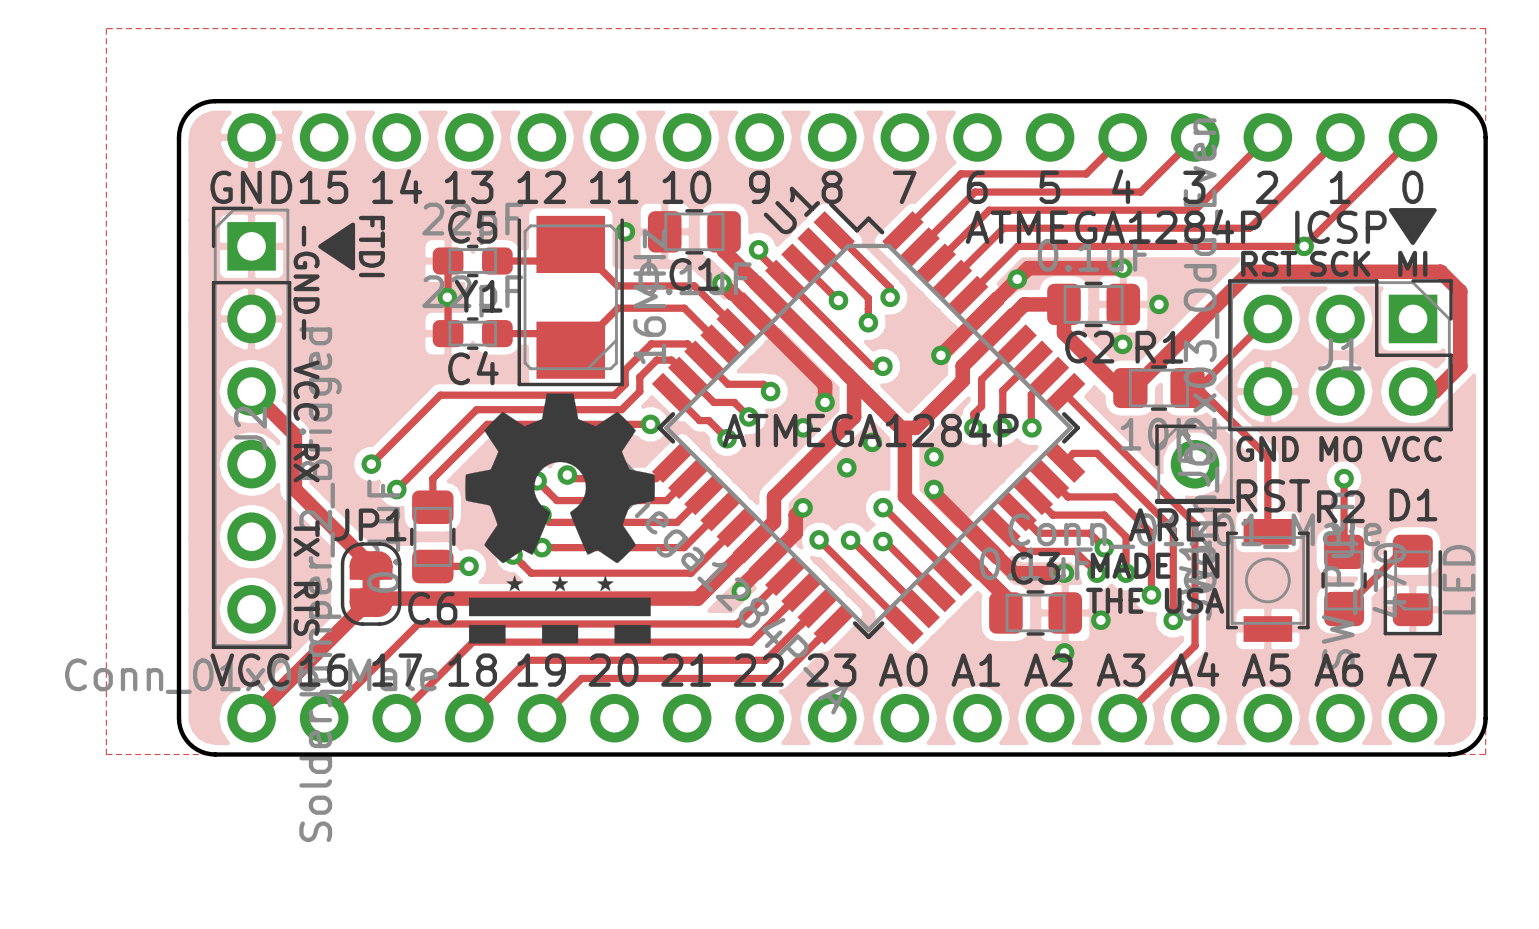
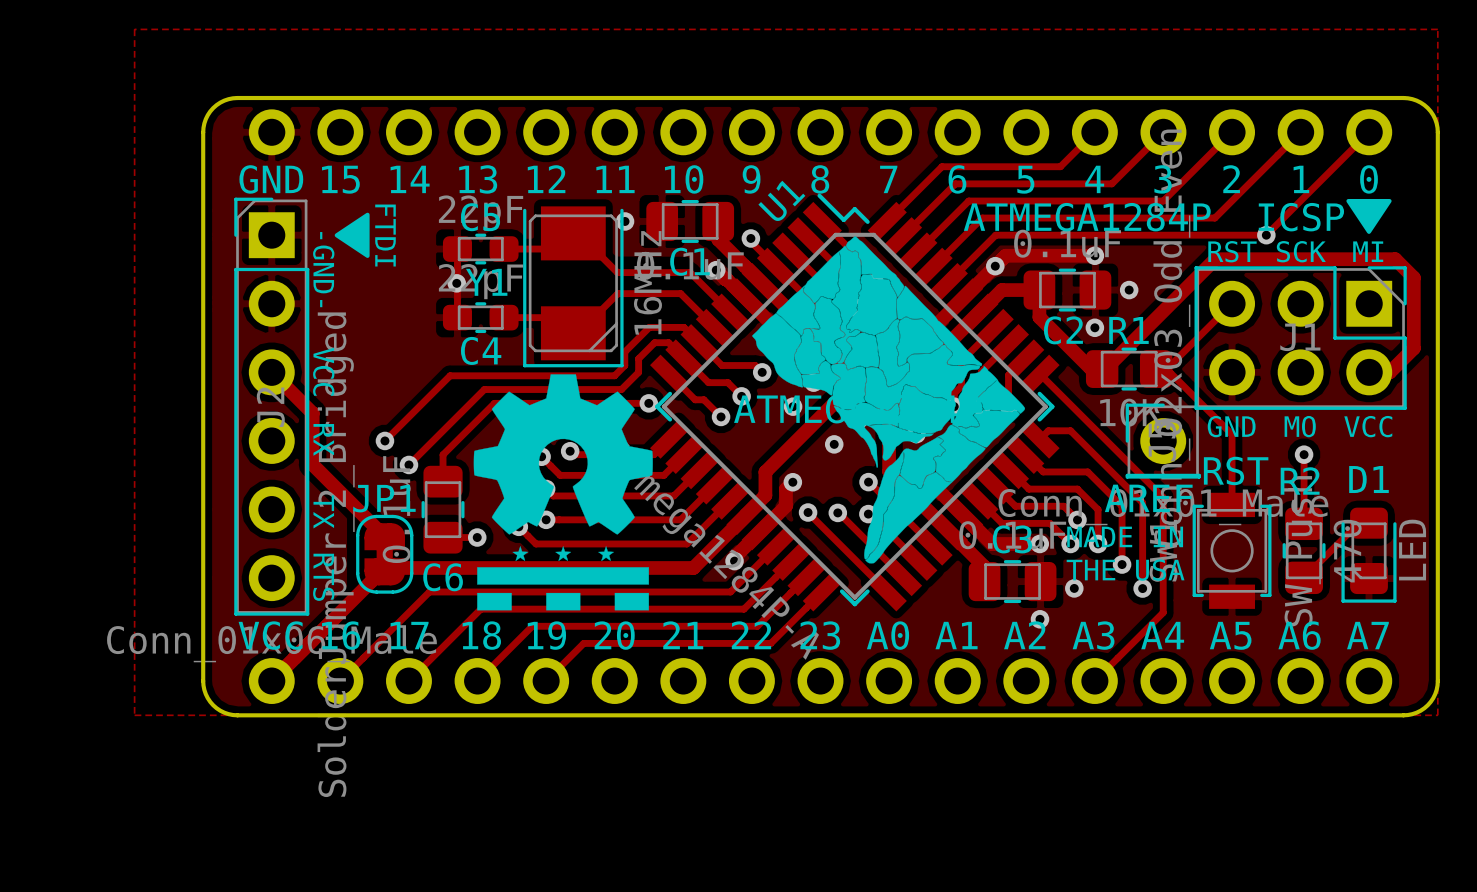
drawing: none -> [752, 236, 1026, 564]

